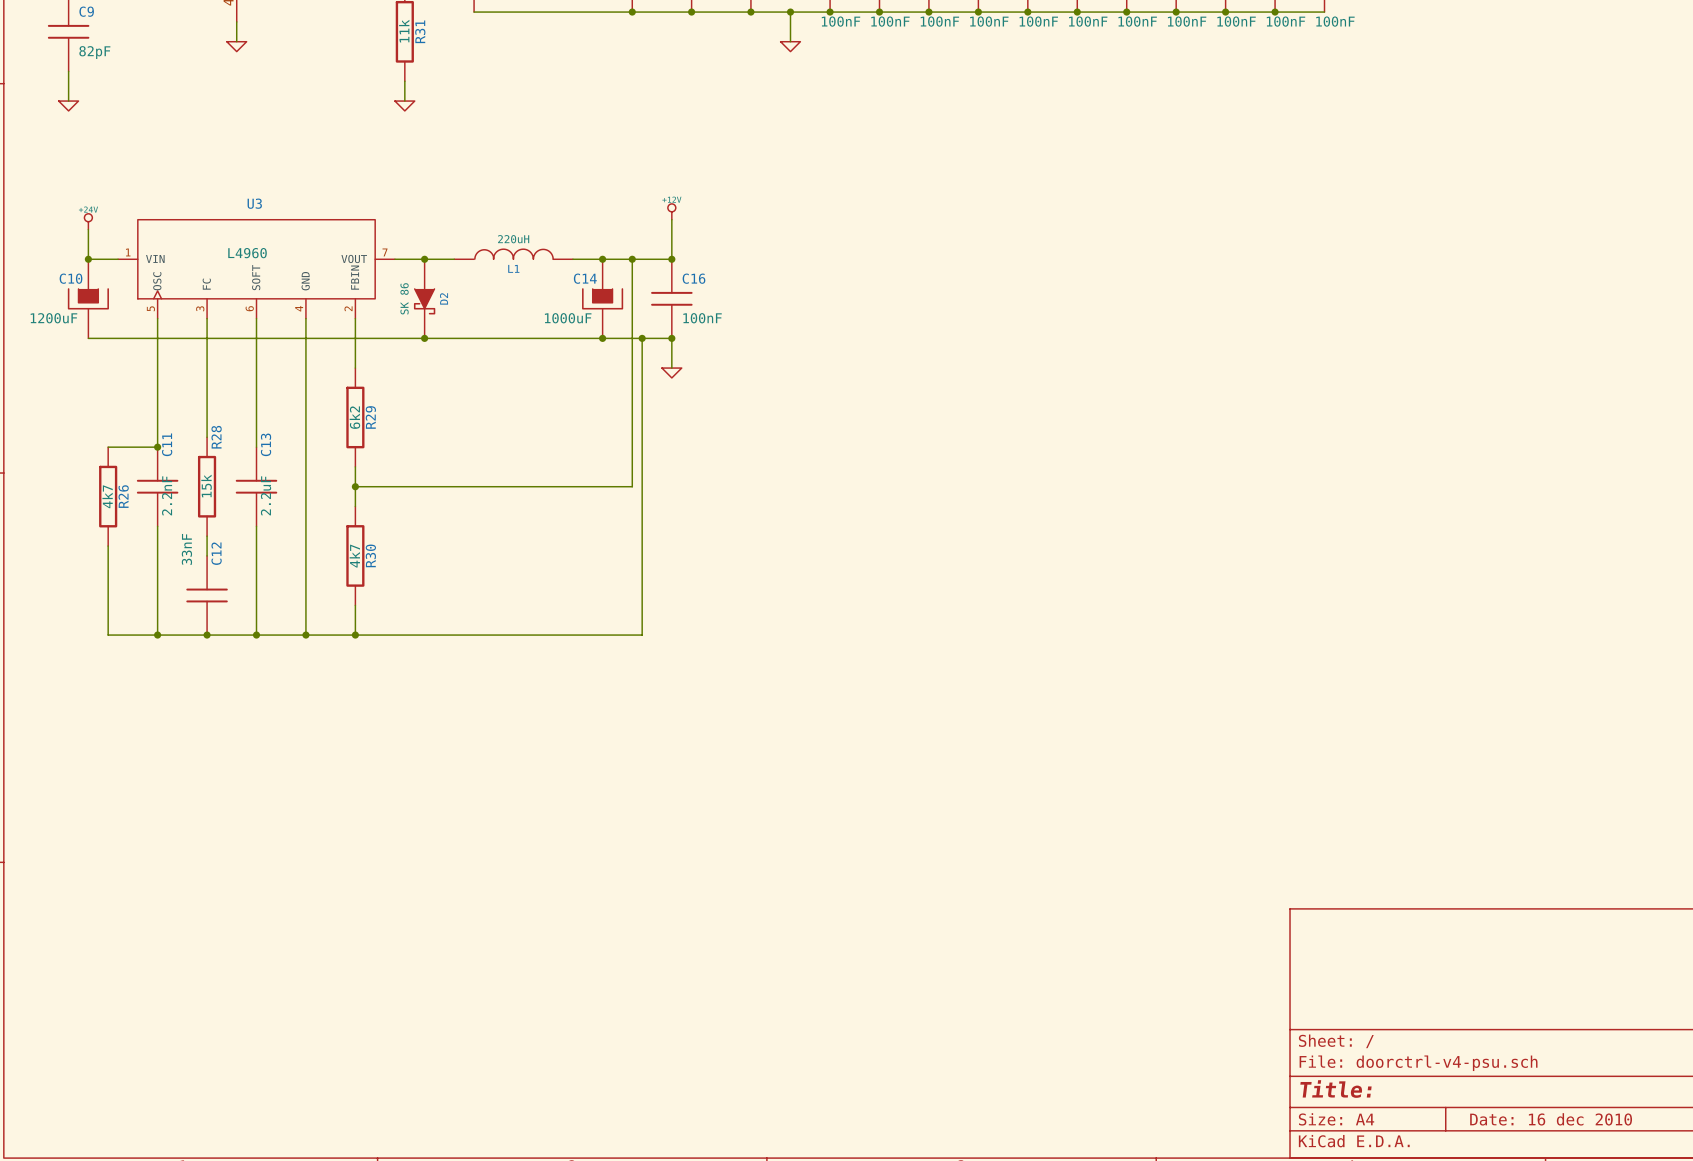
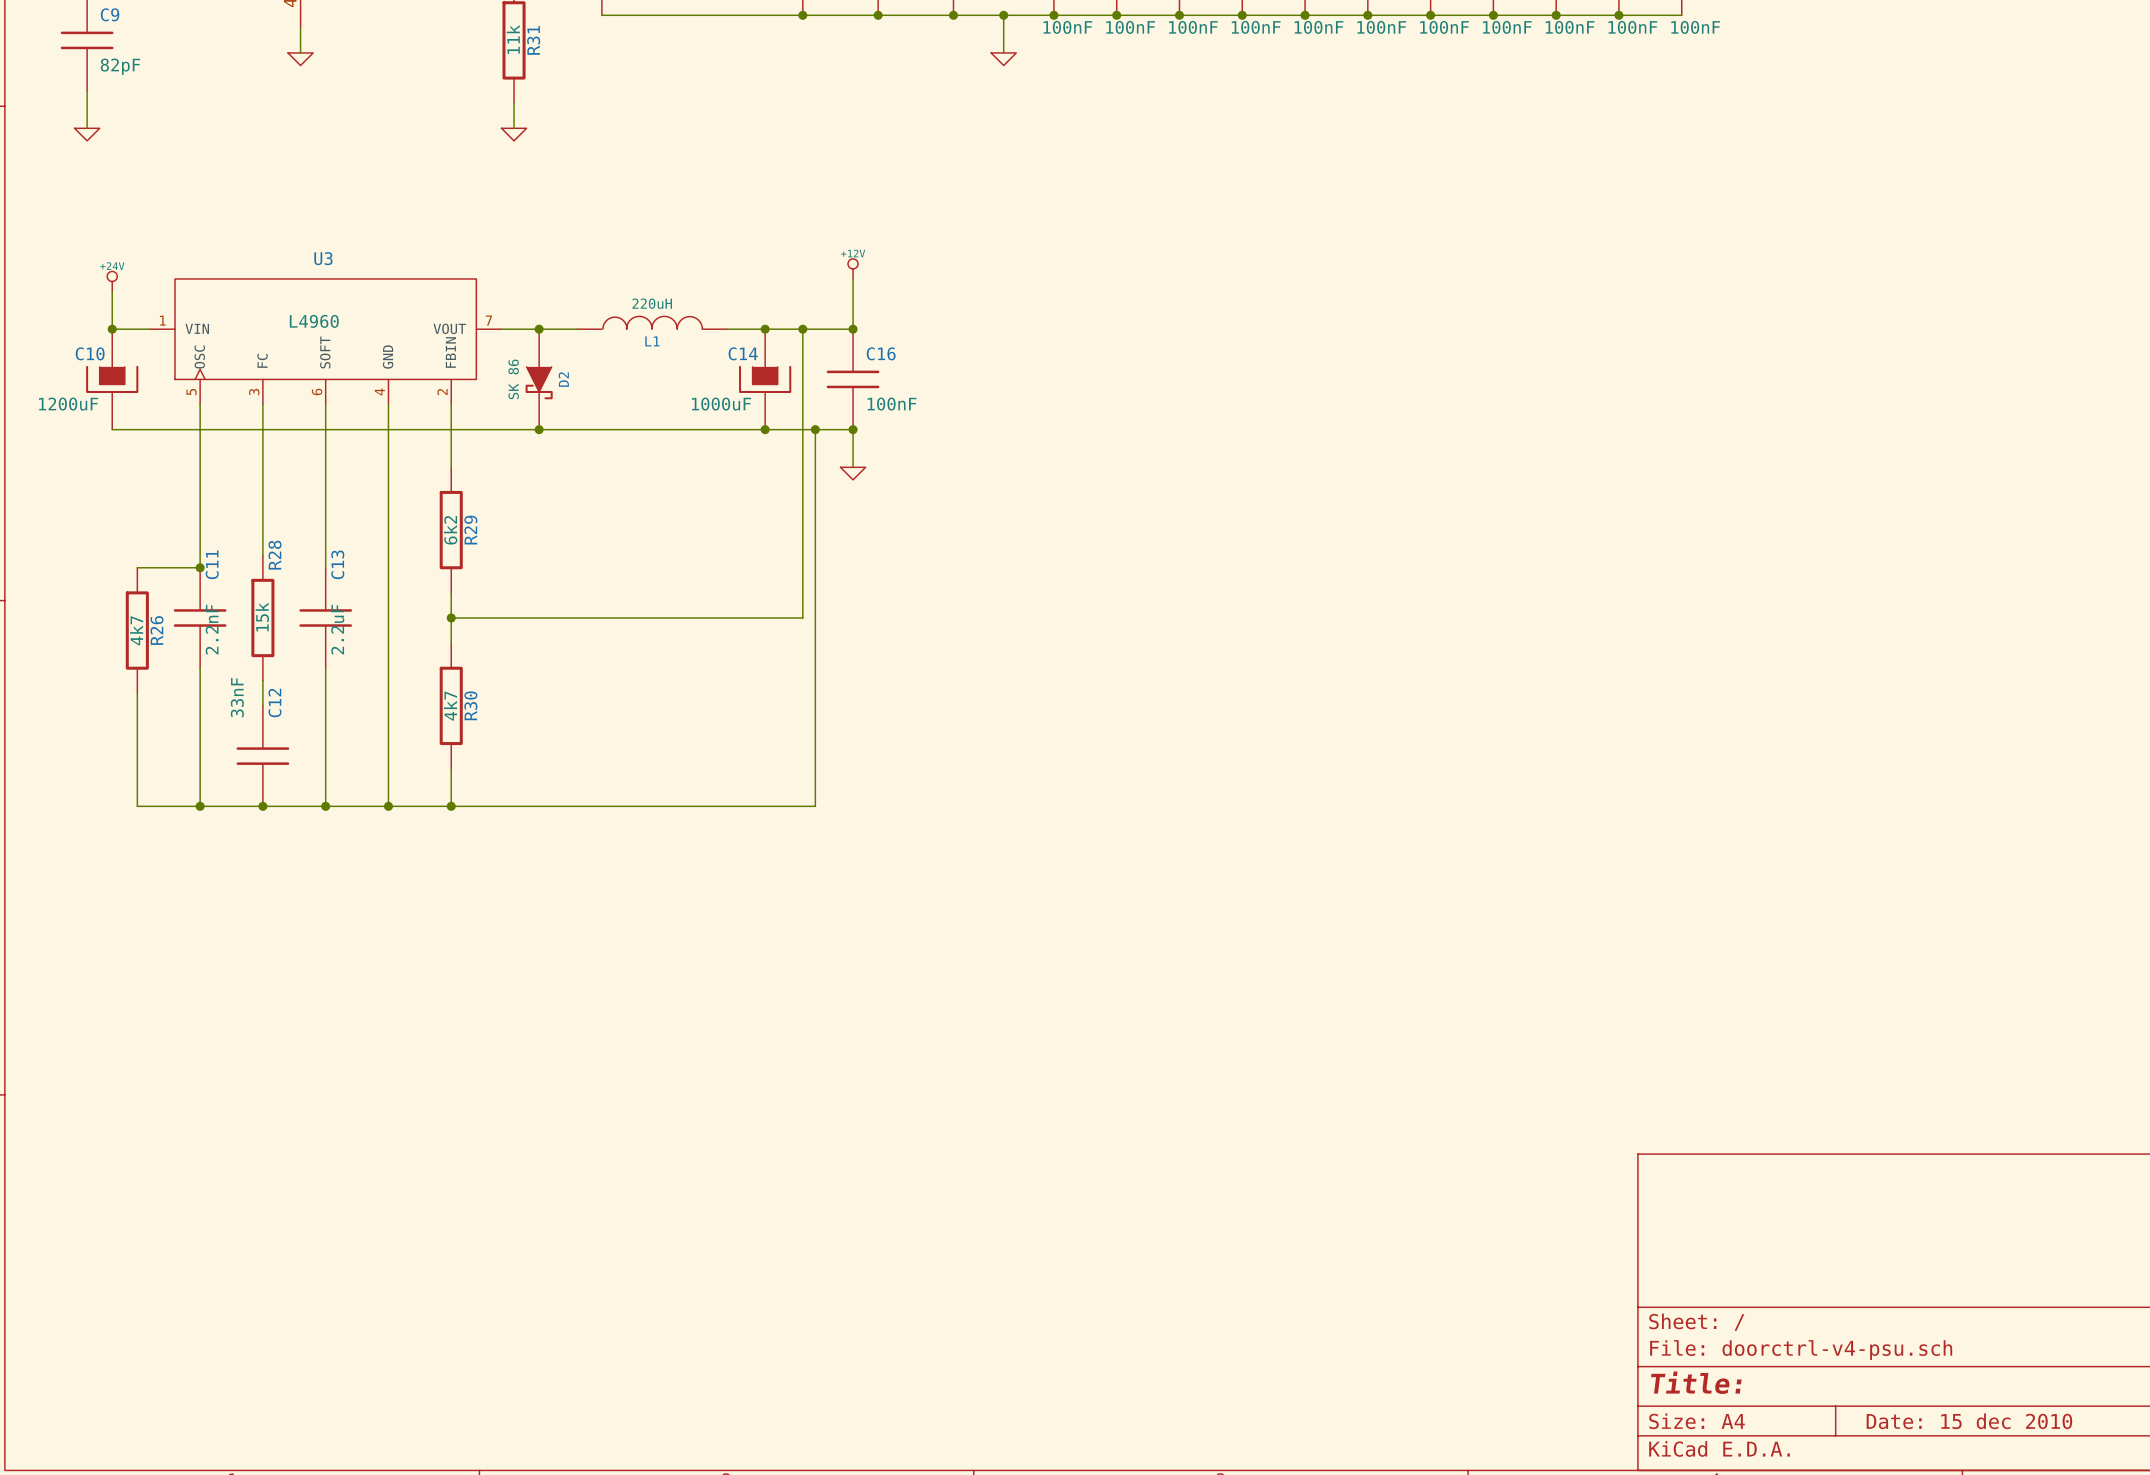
title block: Date: 16 dec 2010 (1551, 1119) -> Date: 15 dec 2010 (1969, 1421)

